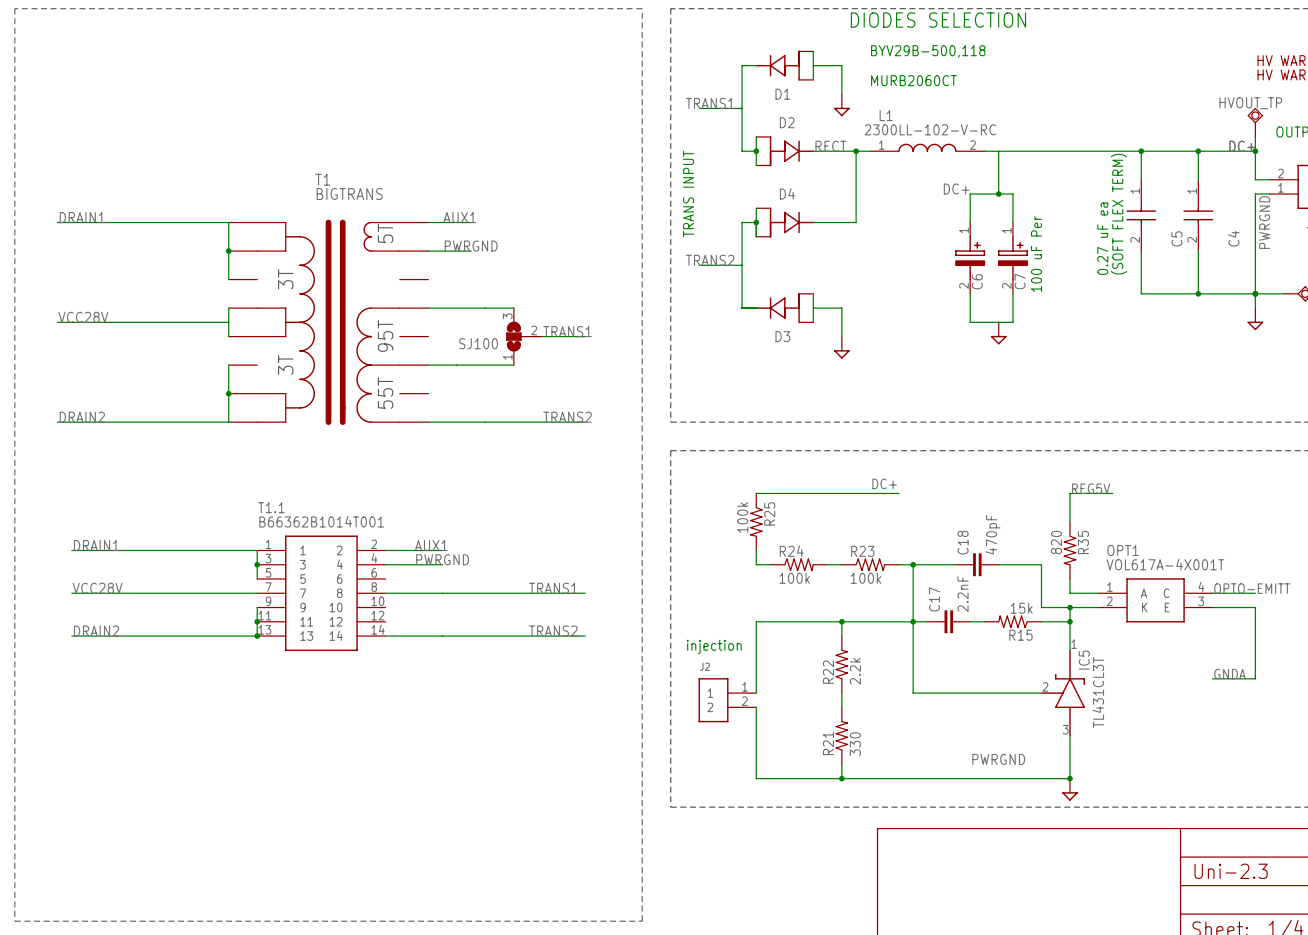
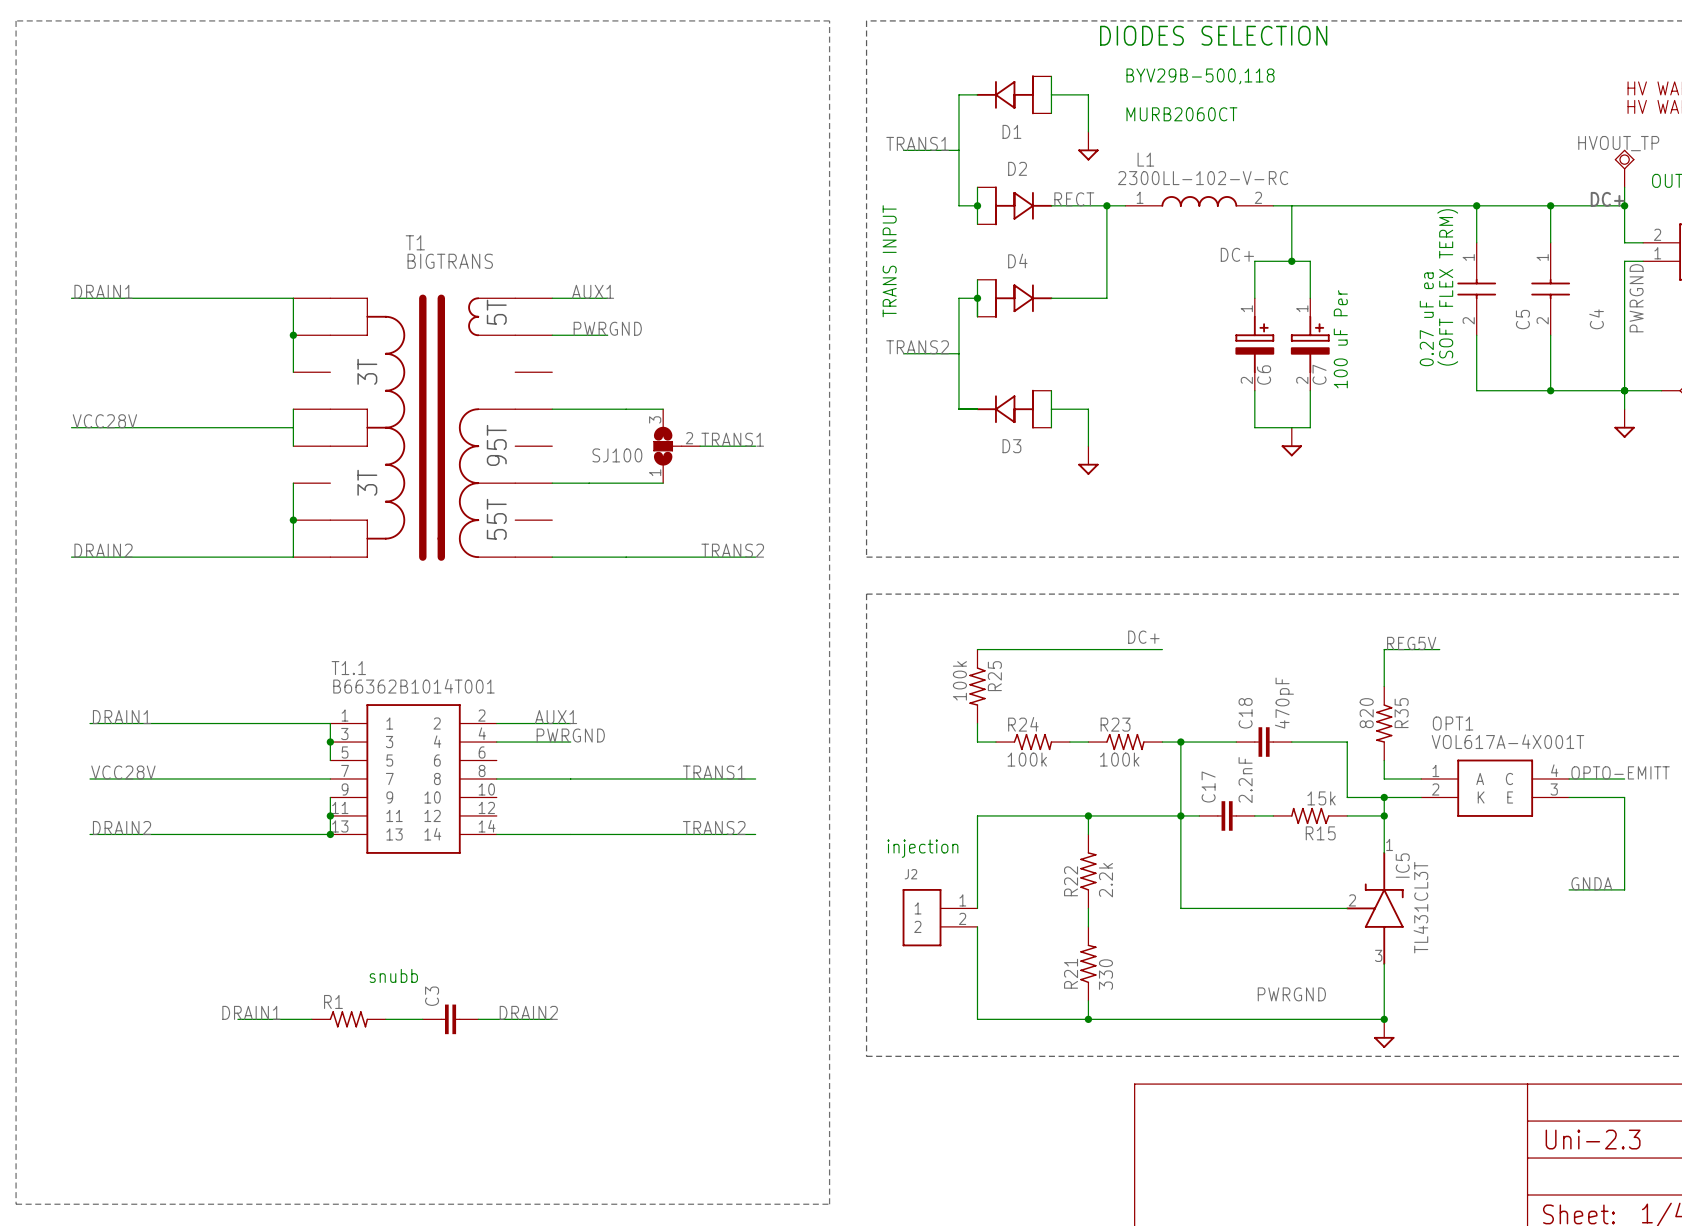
text: none -> snubb (393, 975)
label: none -> DRAIN1 (251, 1012)
label: none -> DRAIN2 (528, 1012)
wire: none -> (237, 1019) (311, 1019)
R1: none -> (348, 1019)
wire: none -> (385, 1019) (422, 1019)
C3: none -> (450, 1019)
wire: none -> (478, 1019) (552, 1019)

